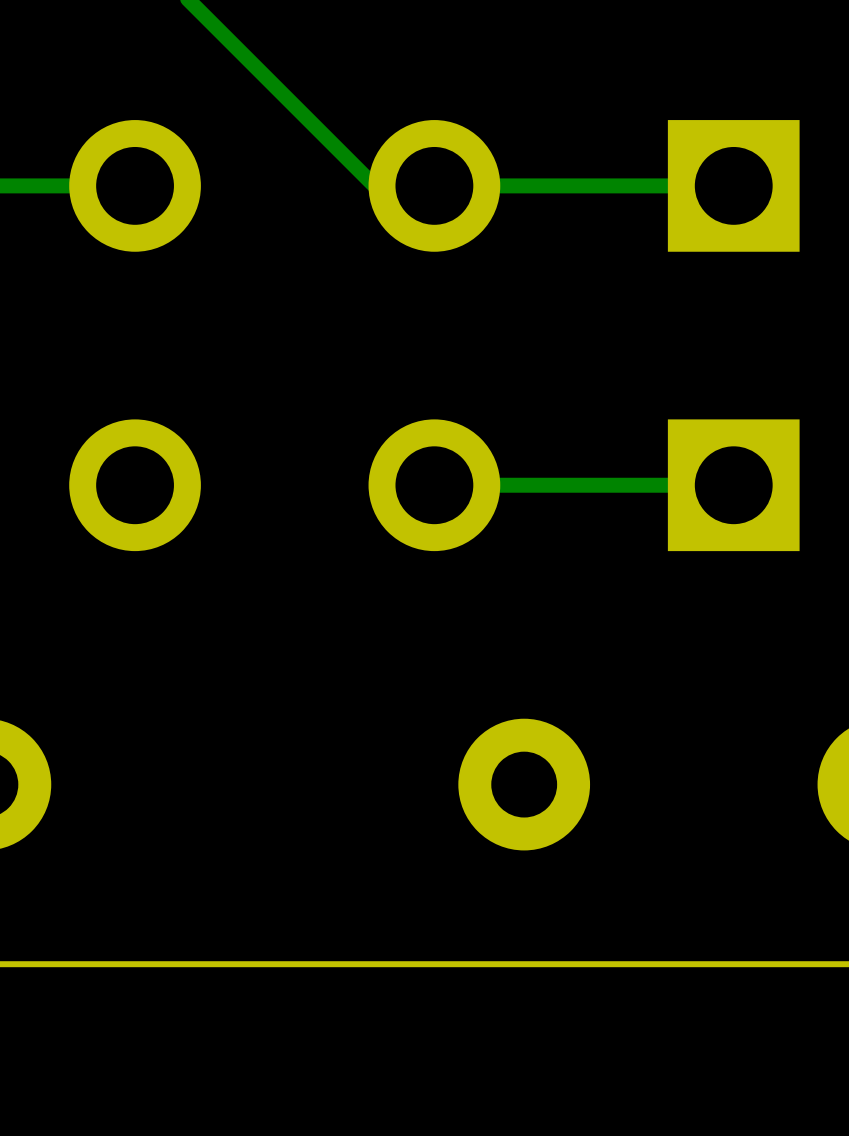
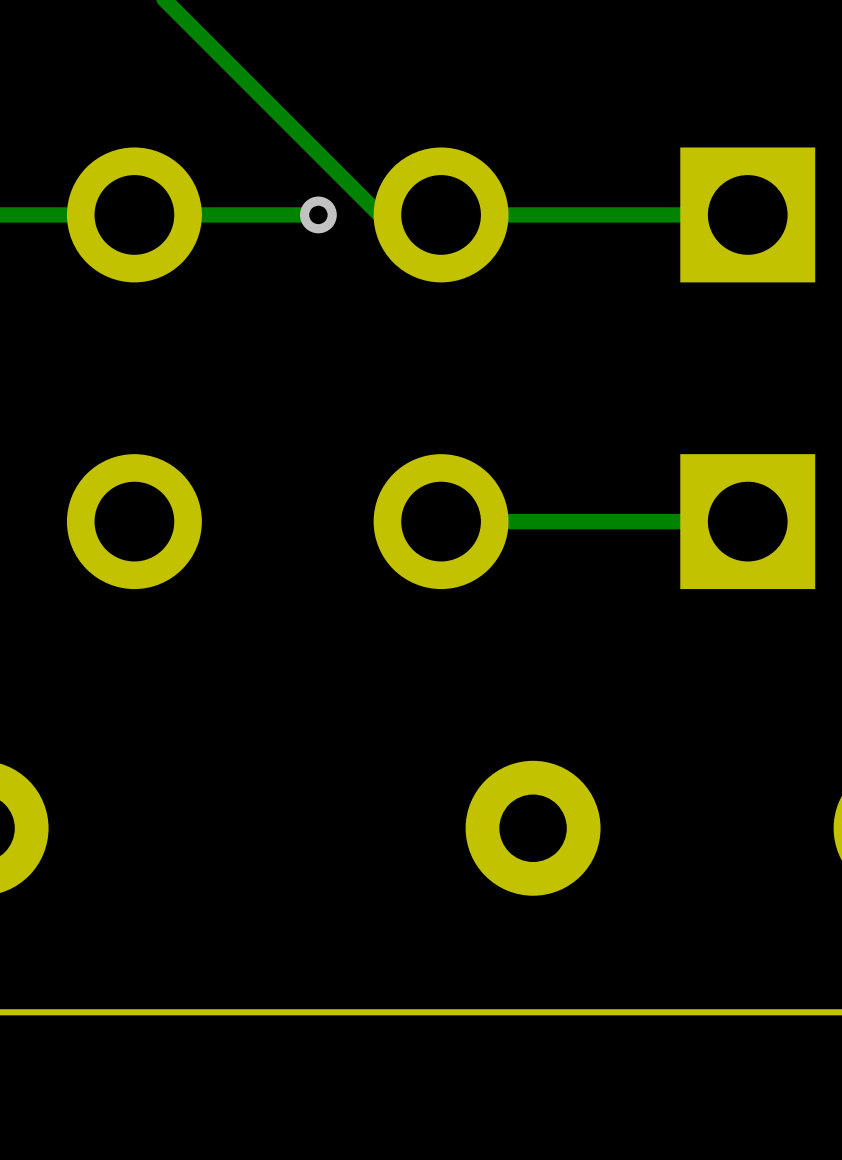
track: none -> (318, 214) (195, 214)
via: none -> (318, 214)

